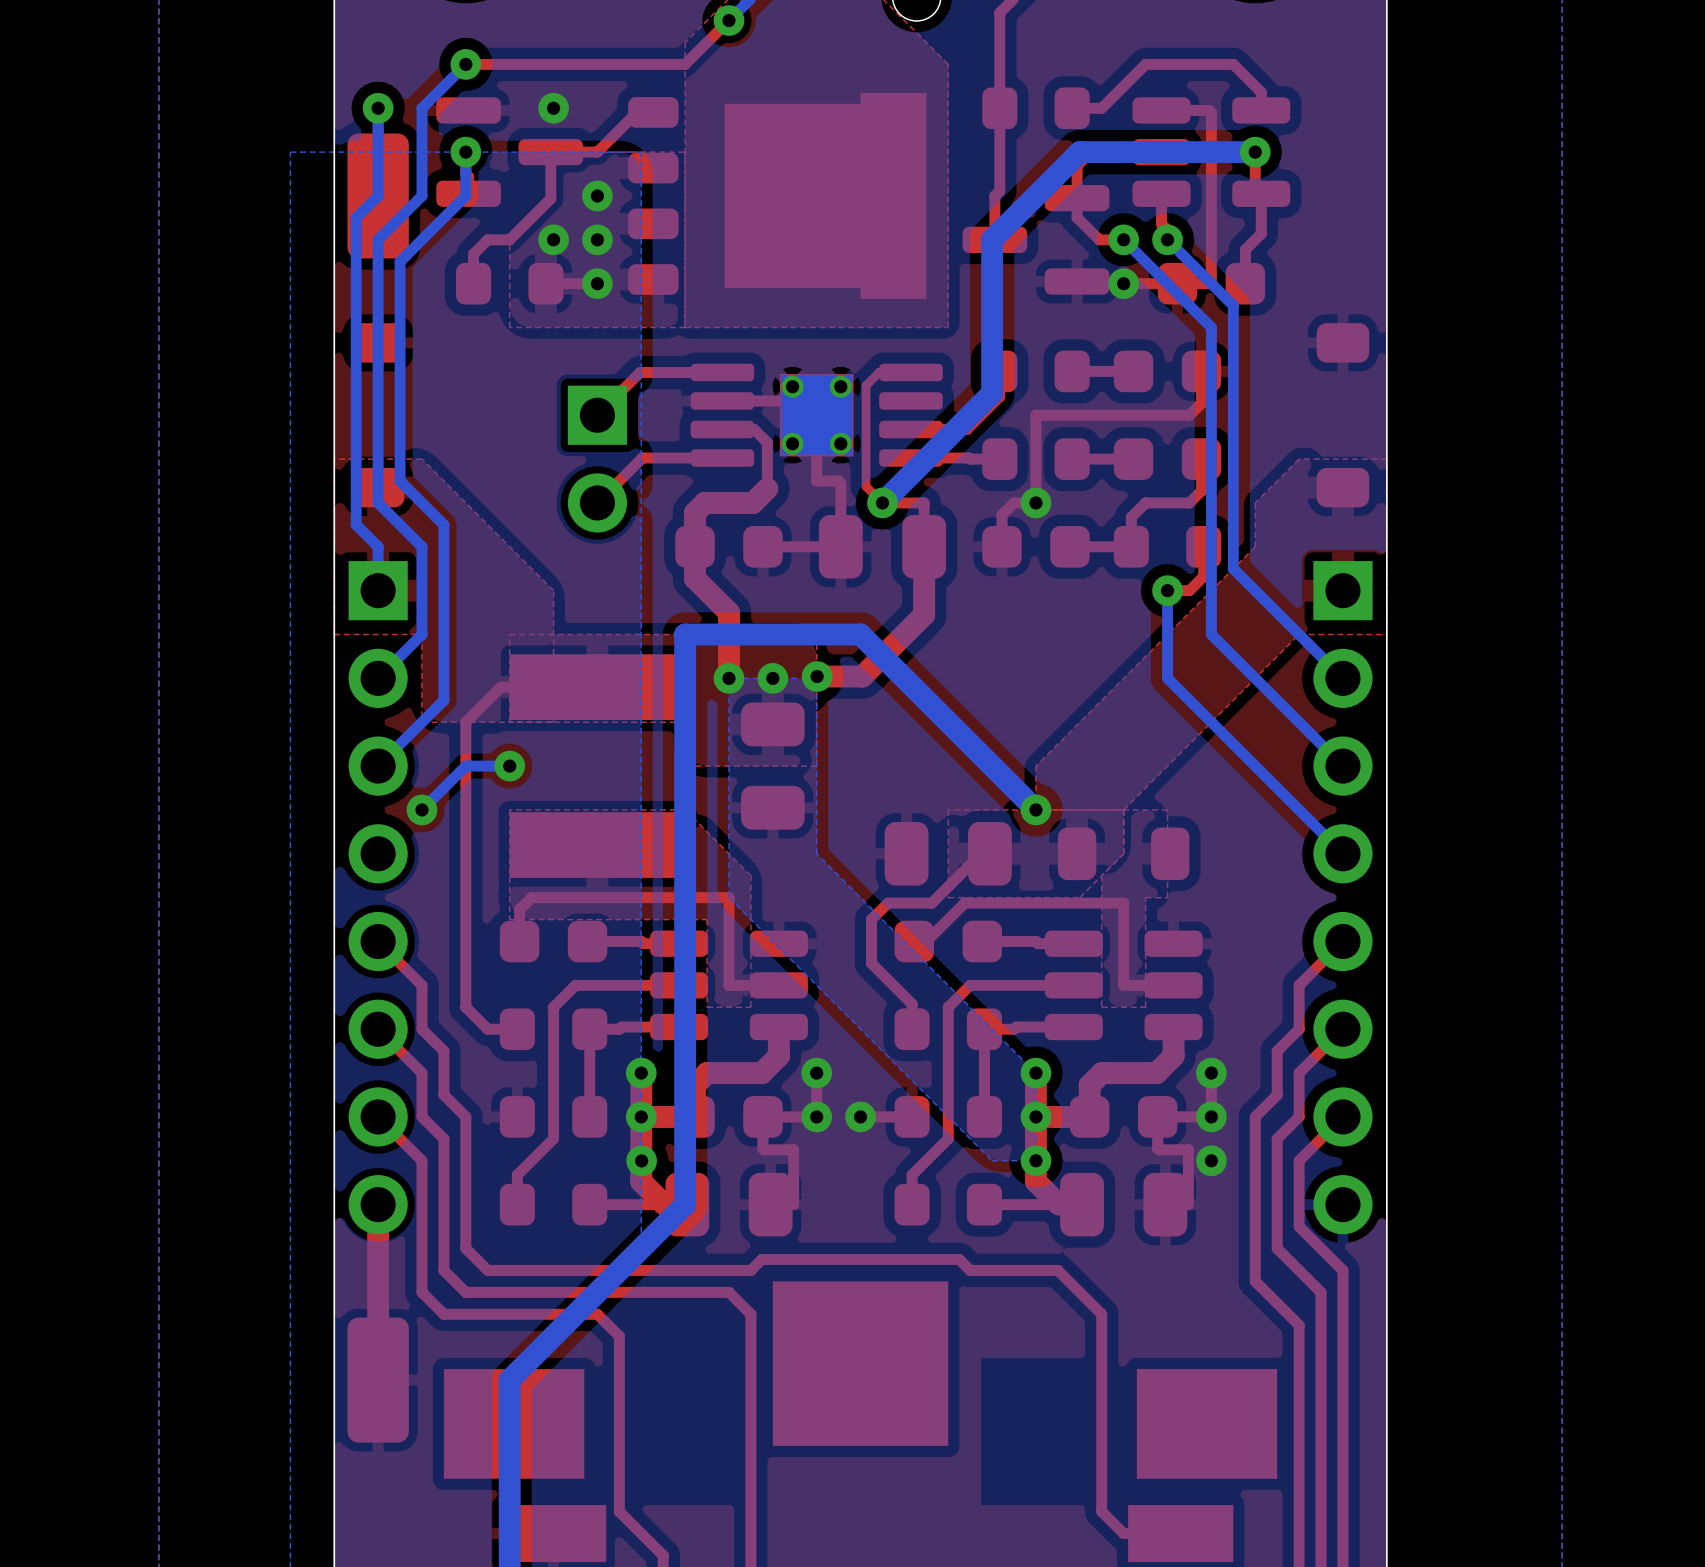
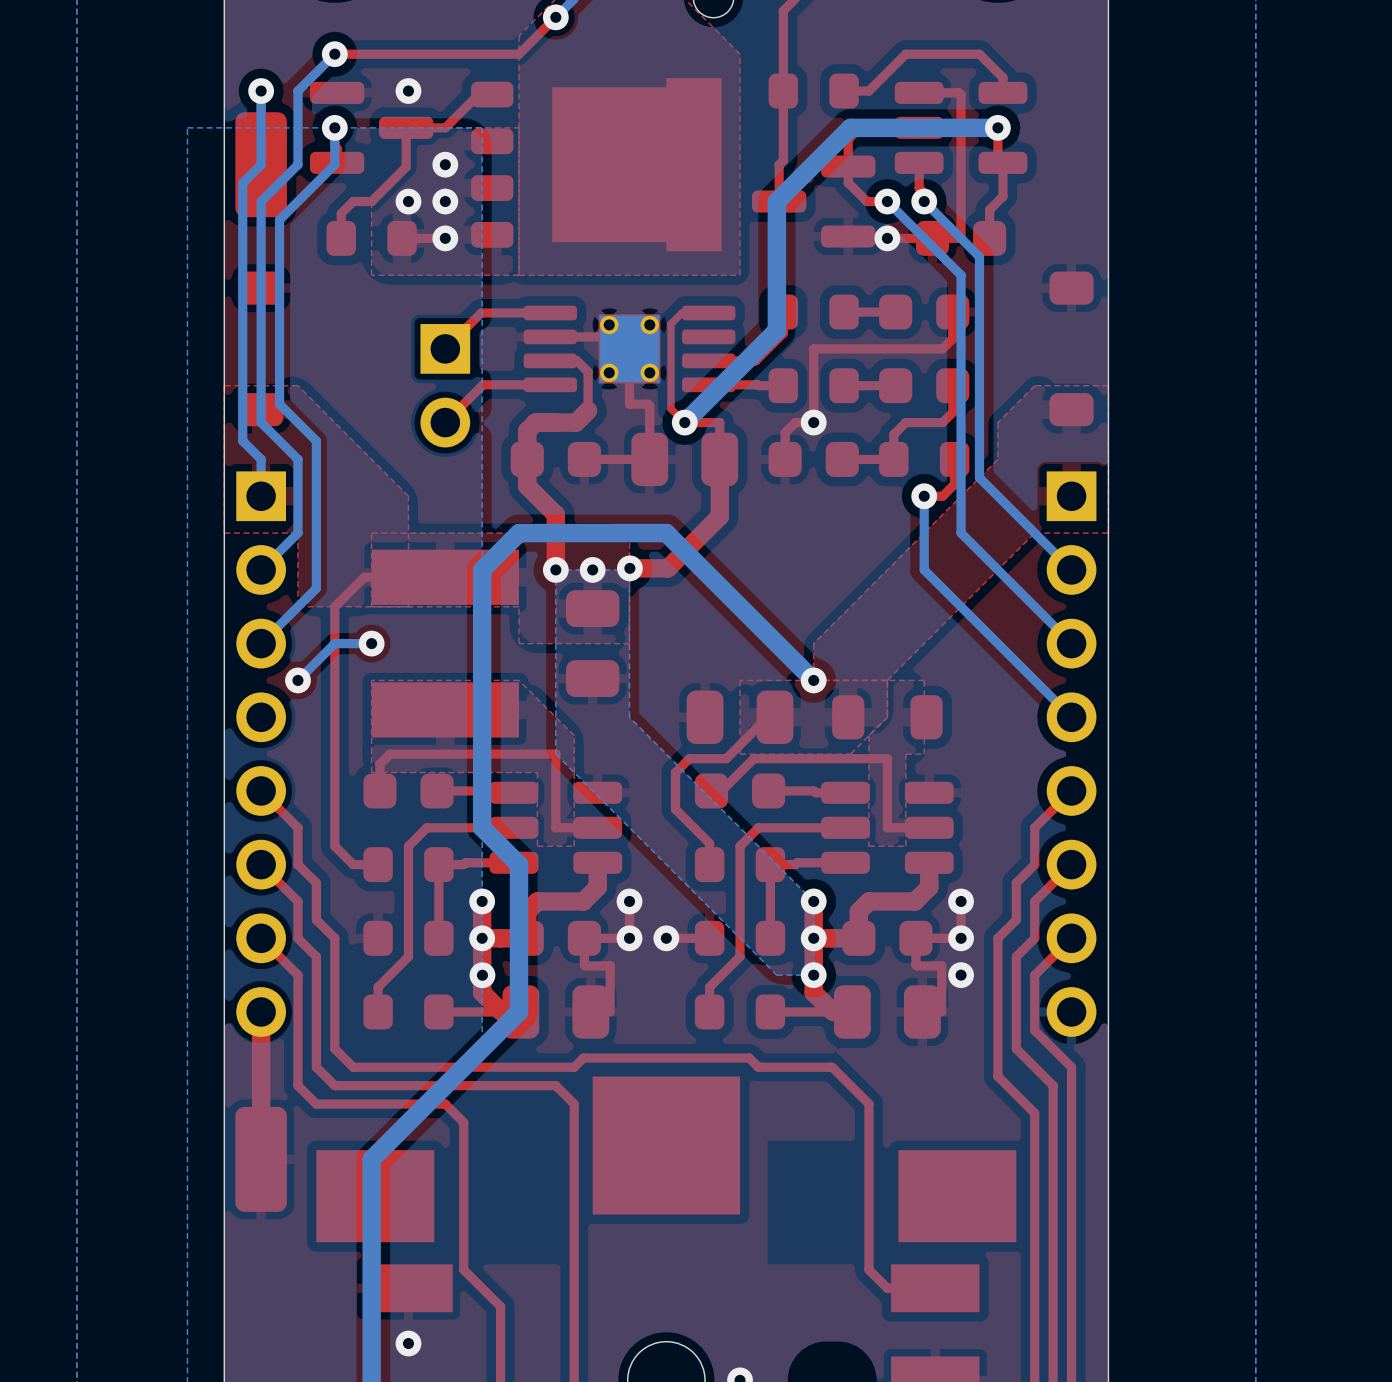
bottom track: (685, 634) (685, 1029) -> (519, 533) (482, 569) (482, 827) (519, 864)

